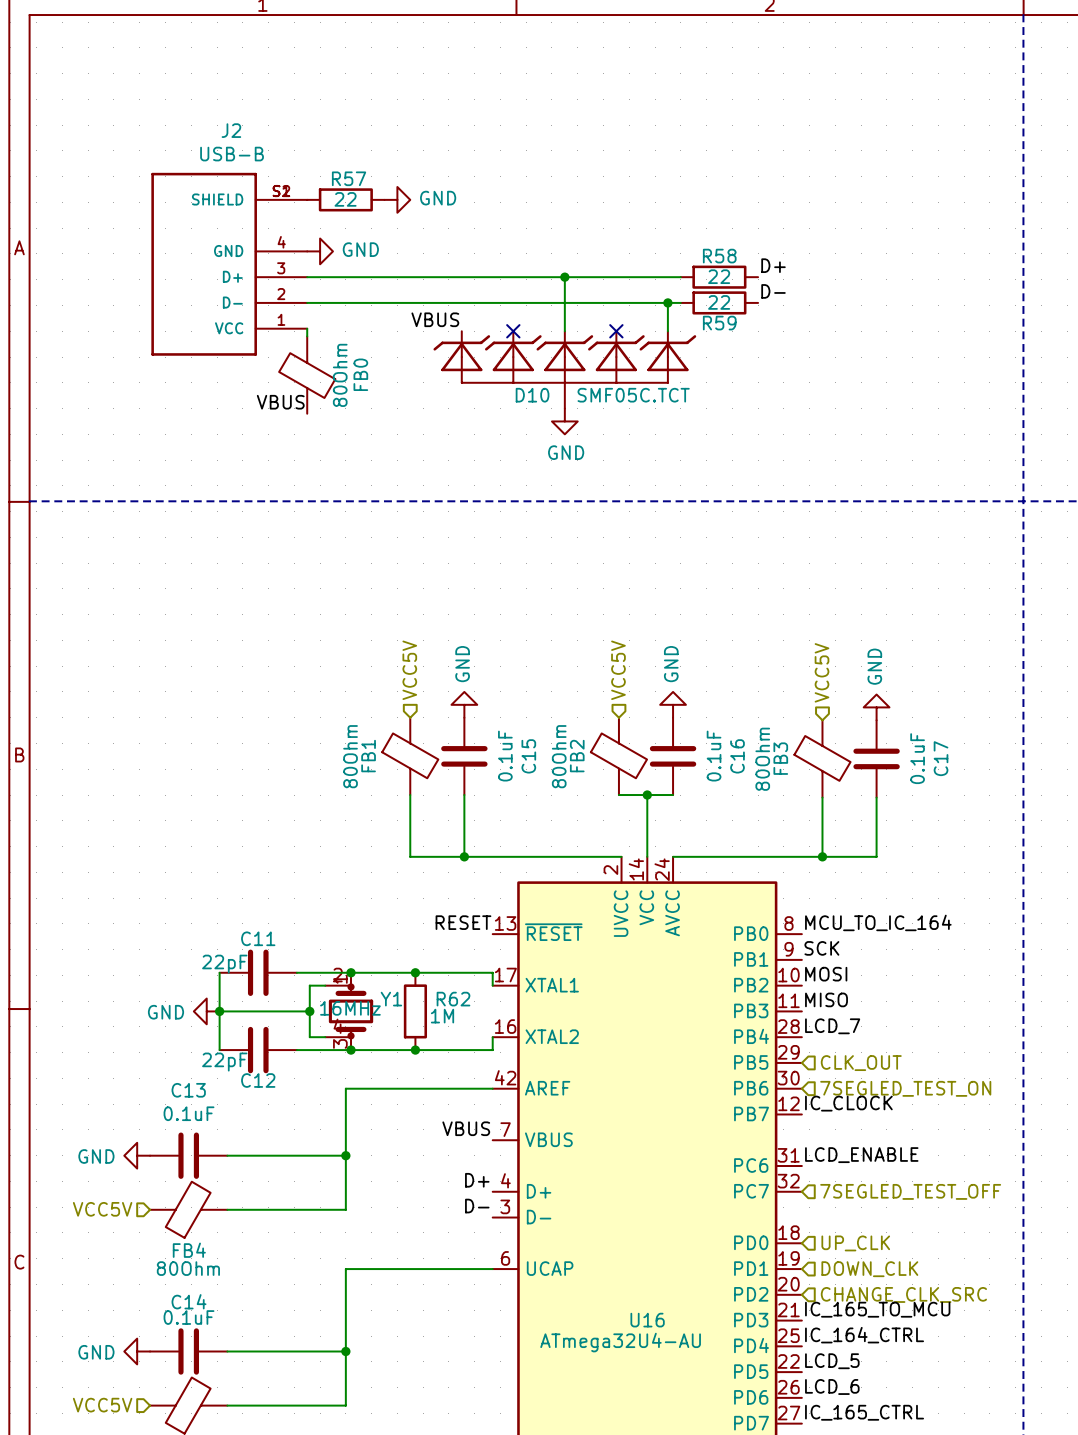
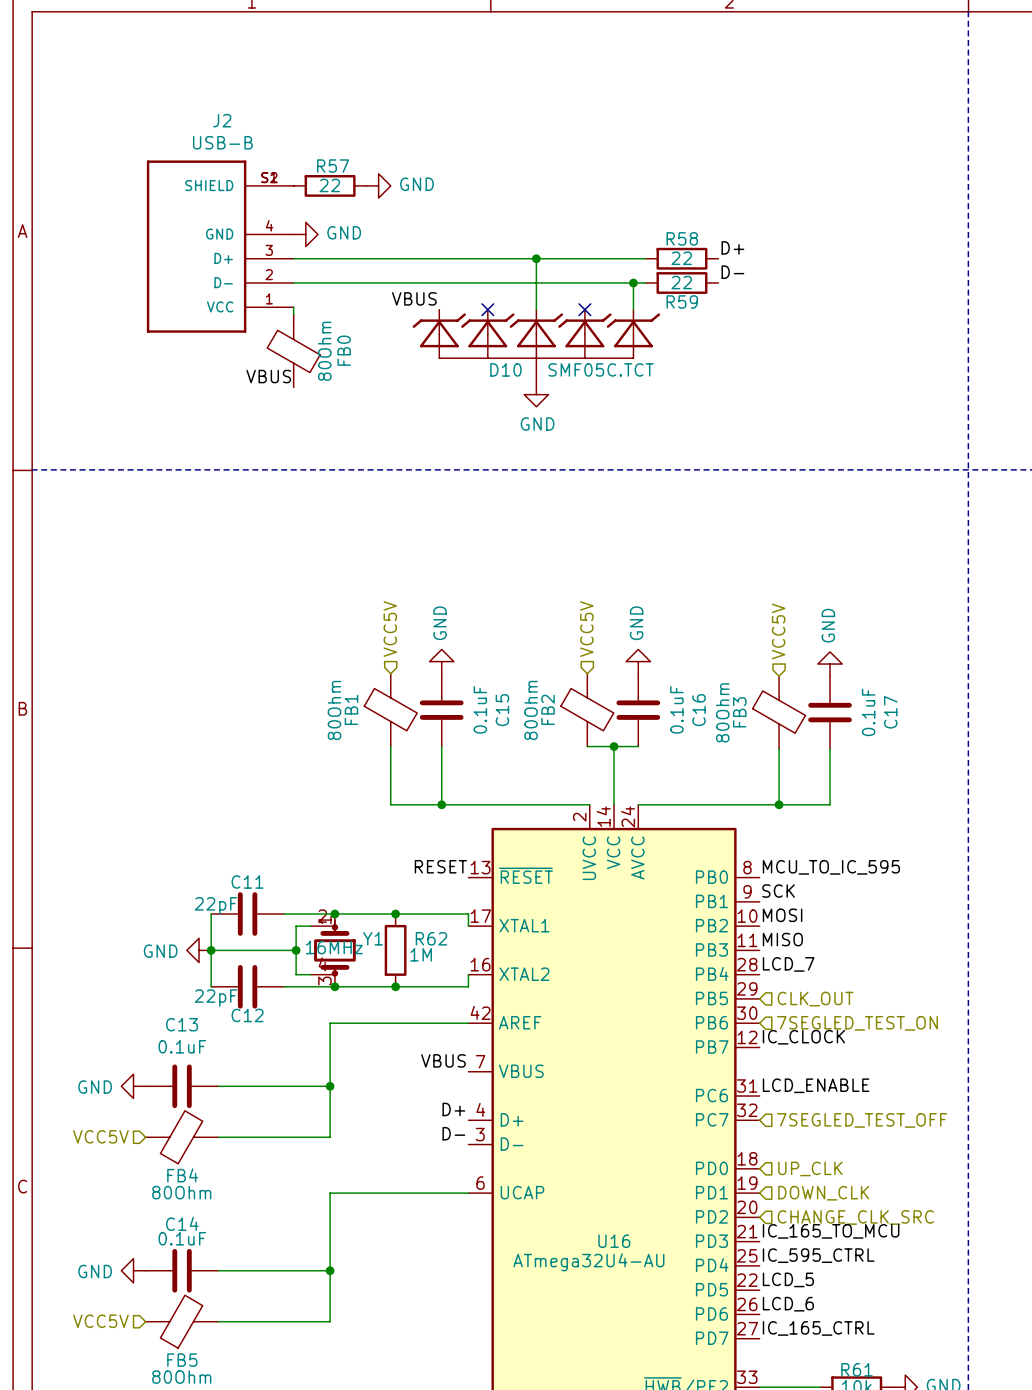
label: MCU_TO_IC_164 (878, 922) -> MCU_TO_IC_595 (831, 867)
label: IC_164_CTRL (864, 1335) -> IC_595_CTRL (818, 1255)

